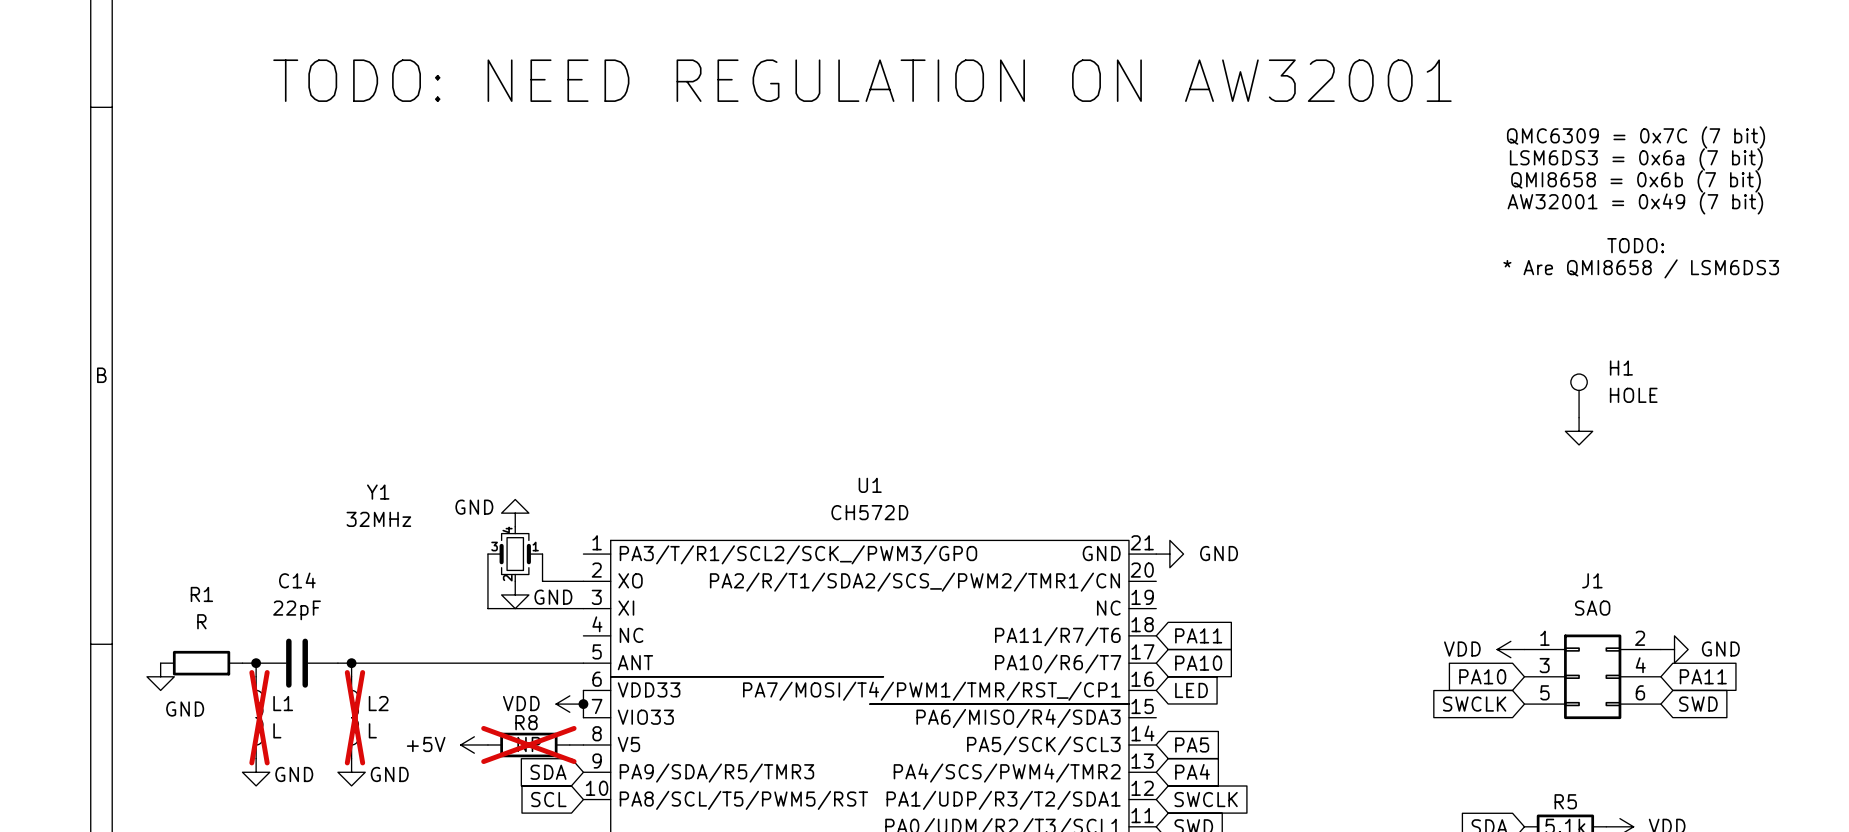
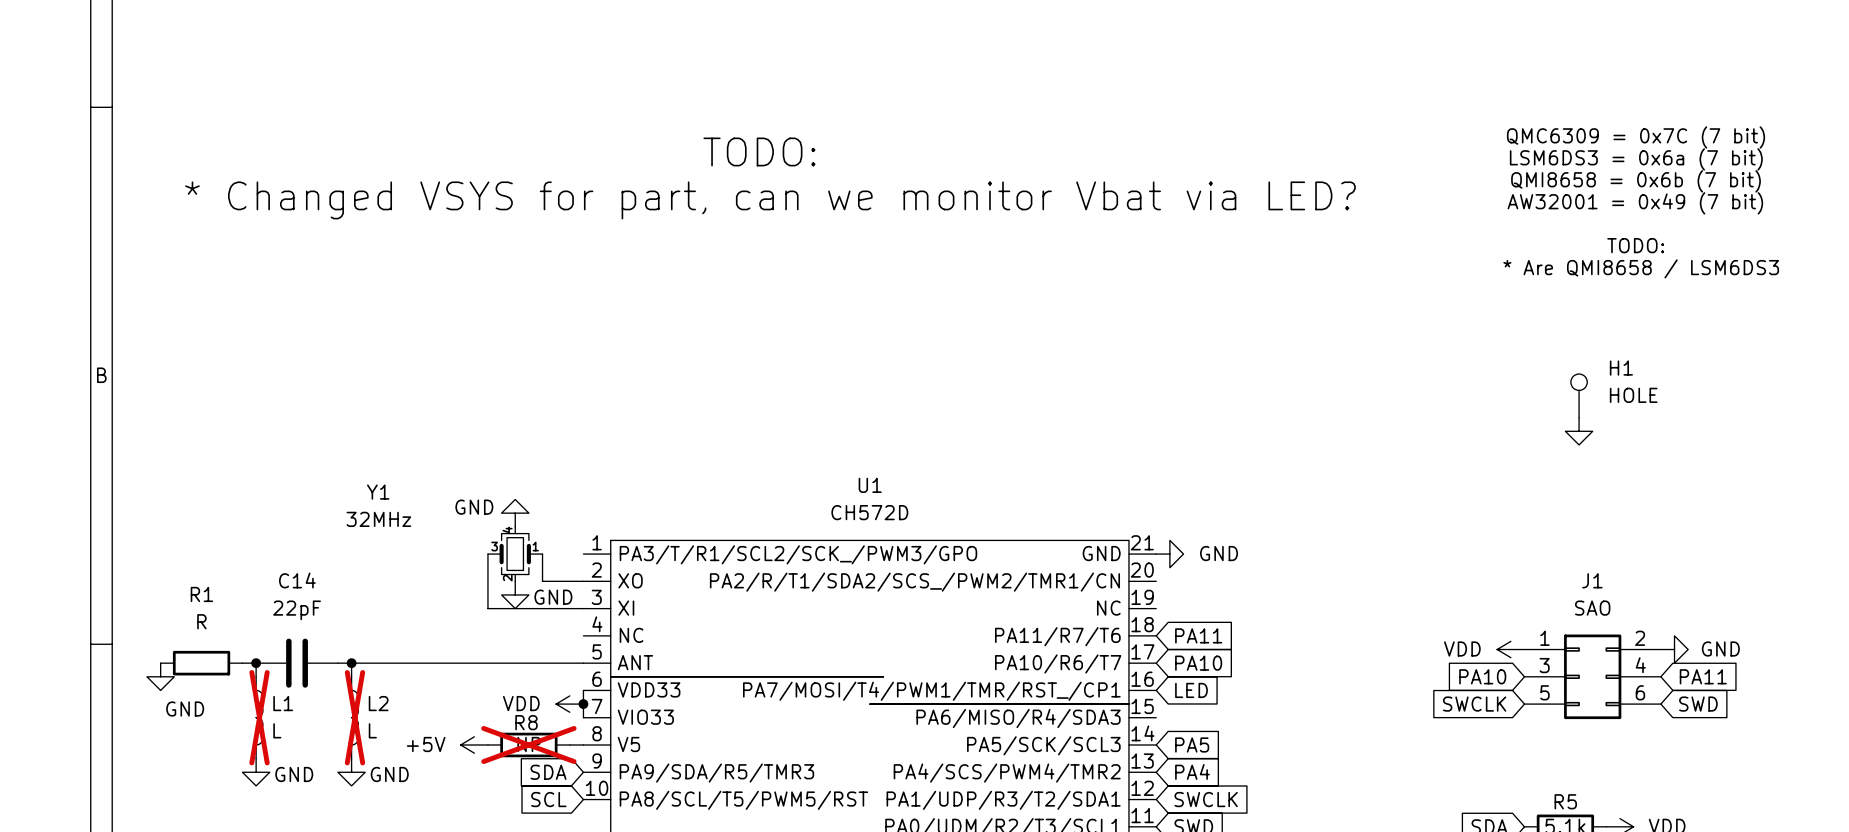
text: TODO: NEED REGULATION ON AW32001 (862, 80) -> none
text: none -> TODO: (759, 151)
text: none -> * Changed VSYS for part, can we monitor Vbat via LED? (770, 200)

